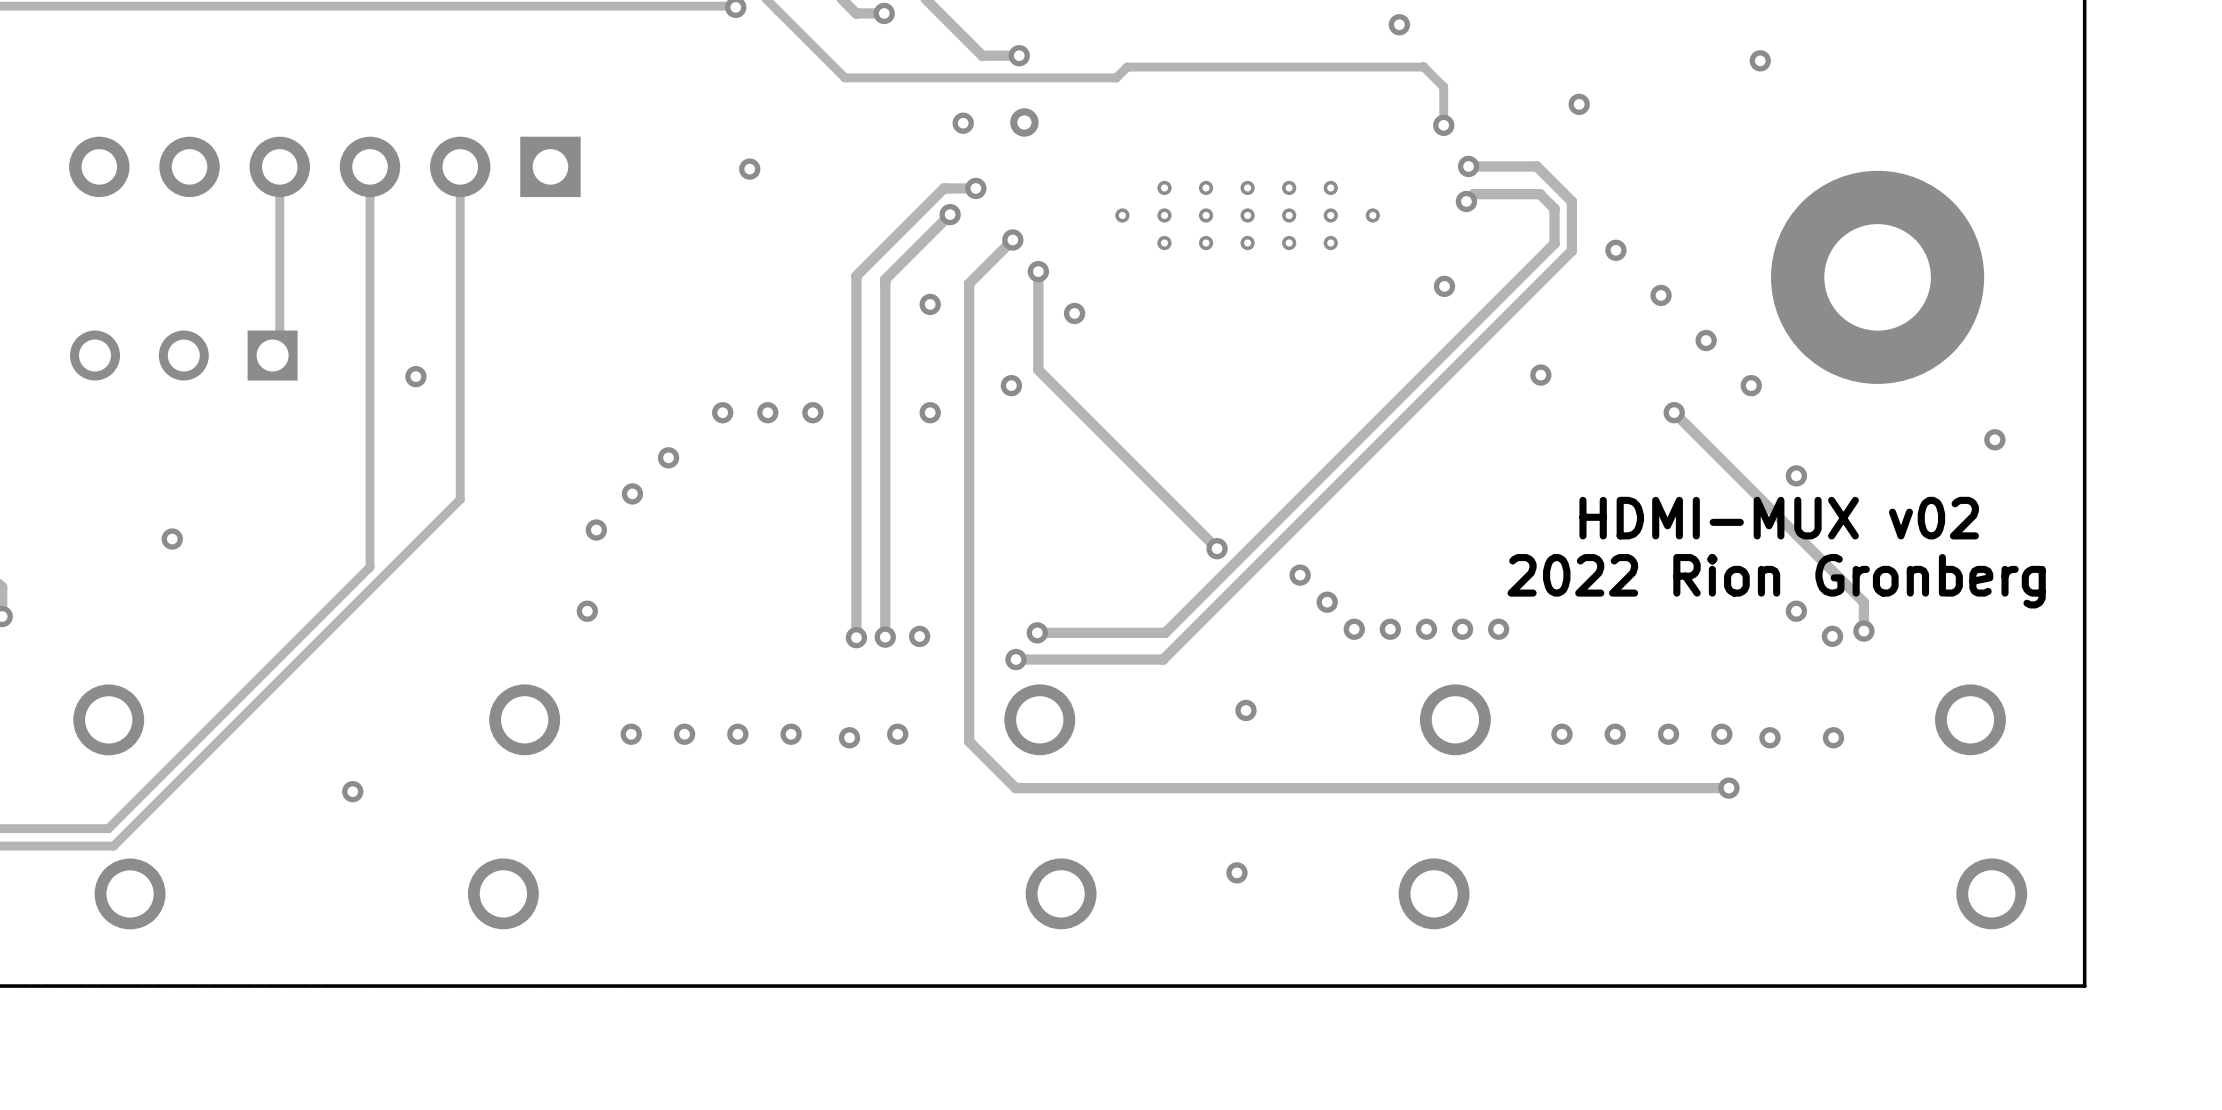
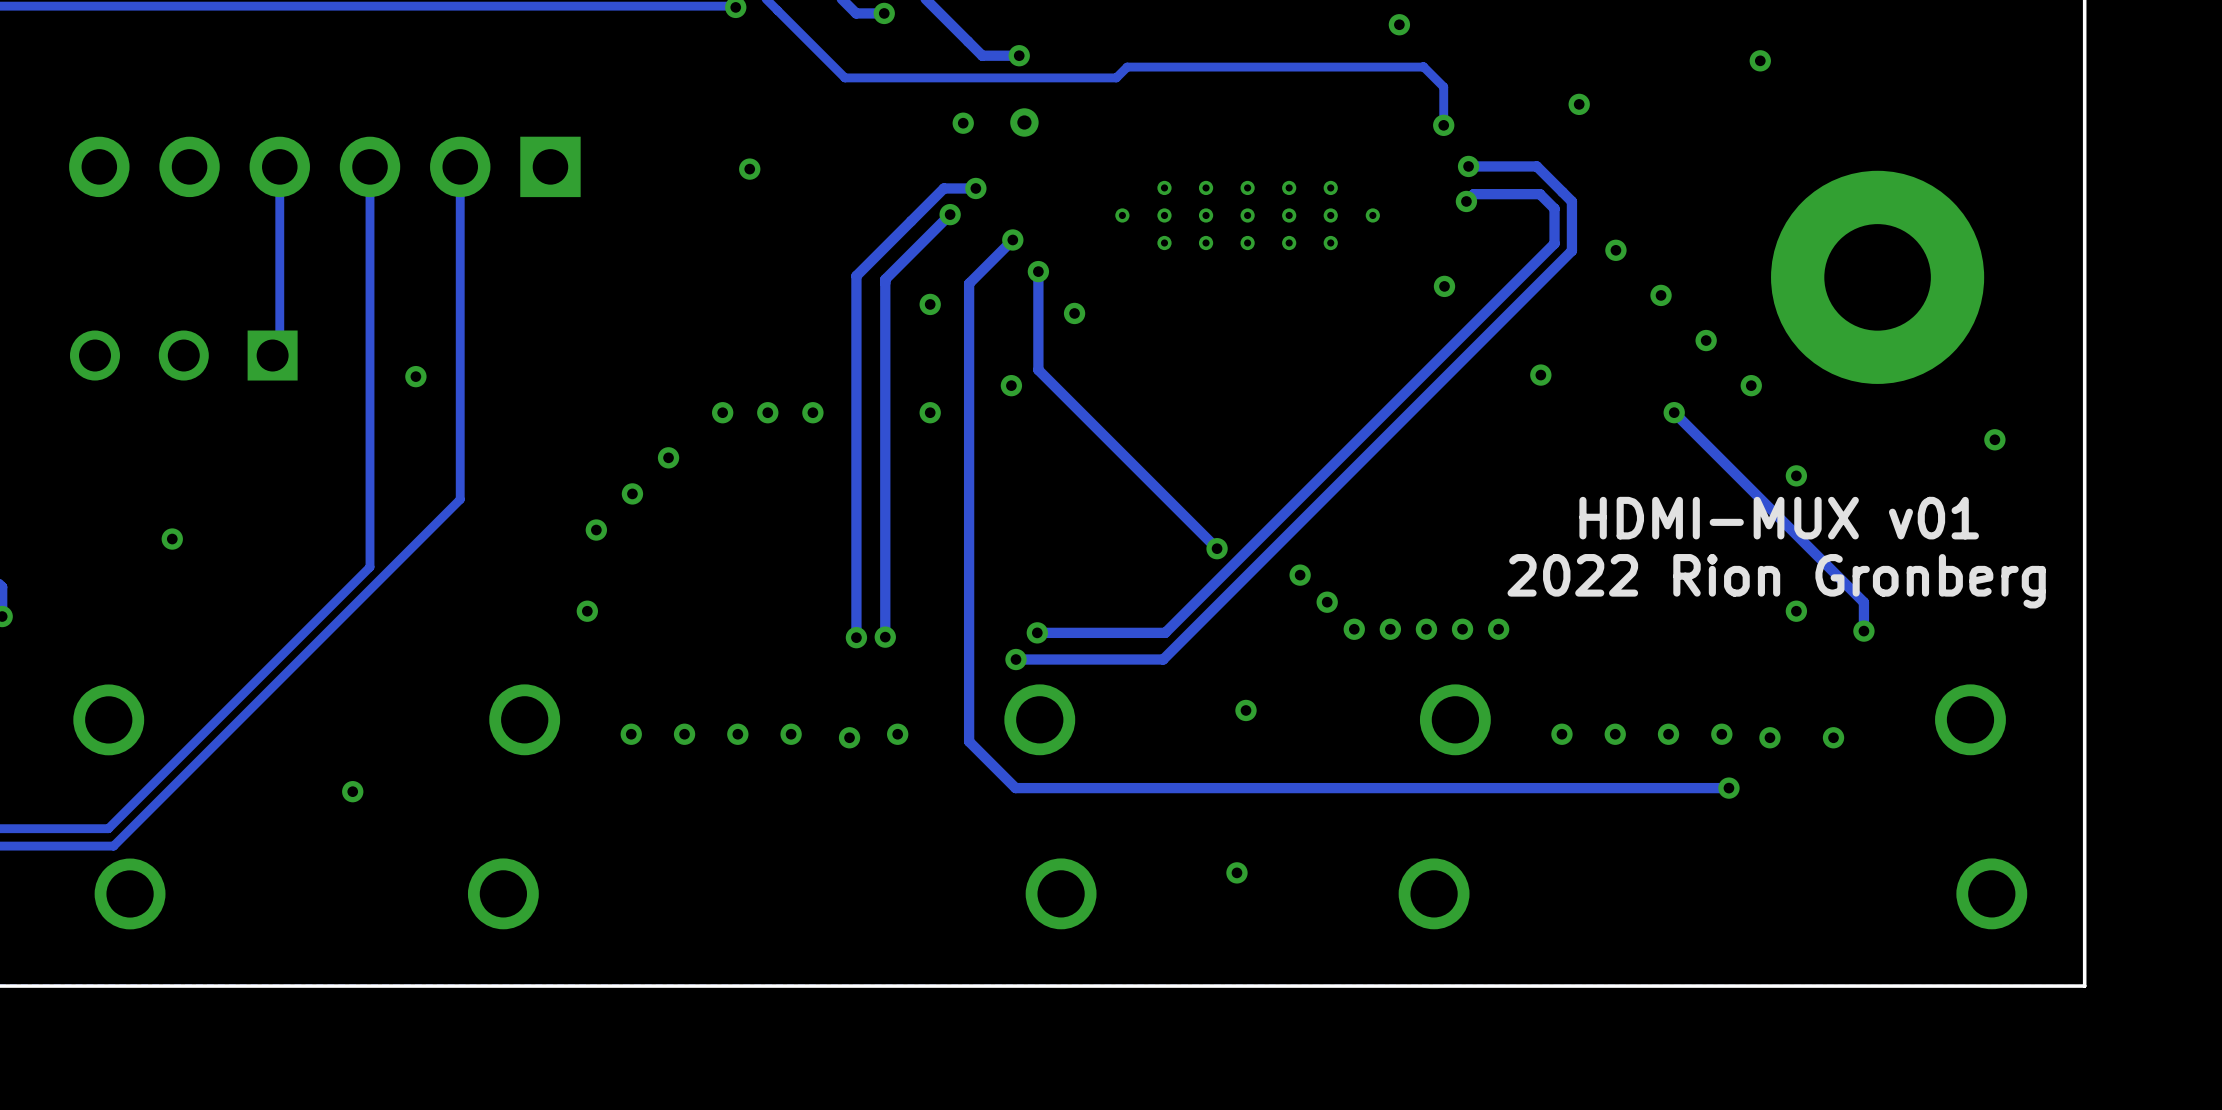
text: HDMI-MUX v02 (1779, 518) -> HDMI-MUX v01 (1779, 518)
via: (919, 636) -> none
via: (1832, 636) -> none

